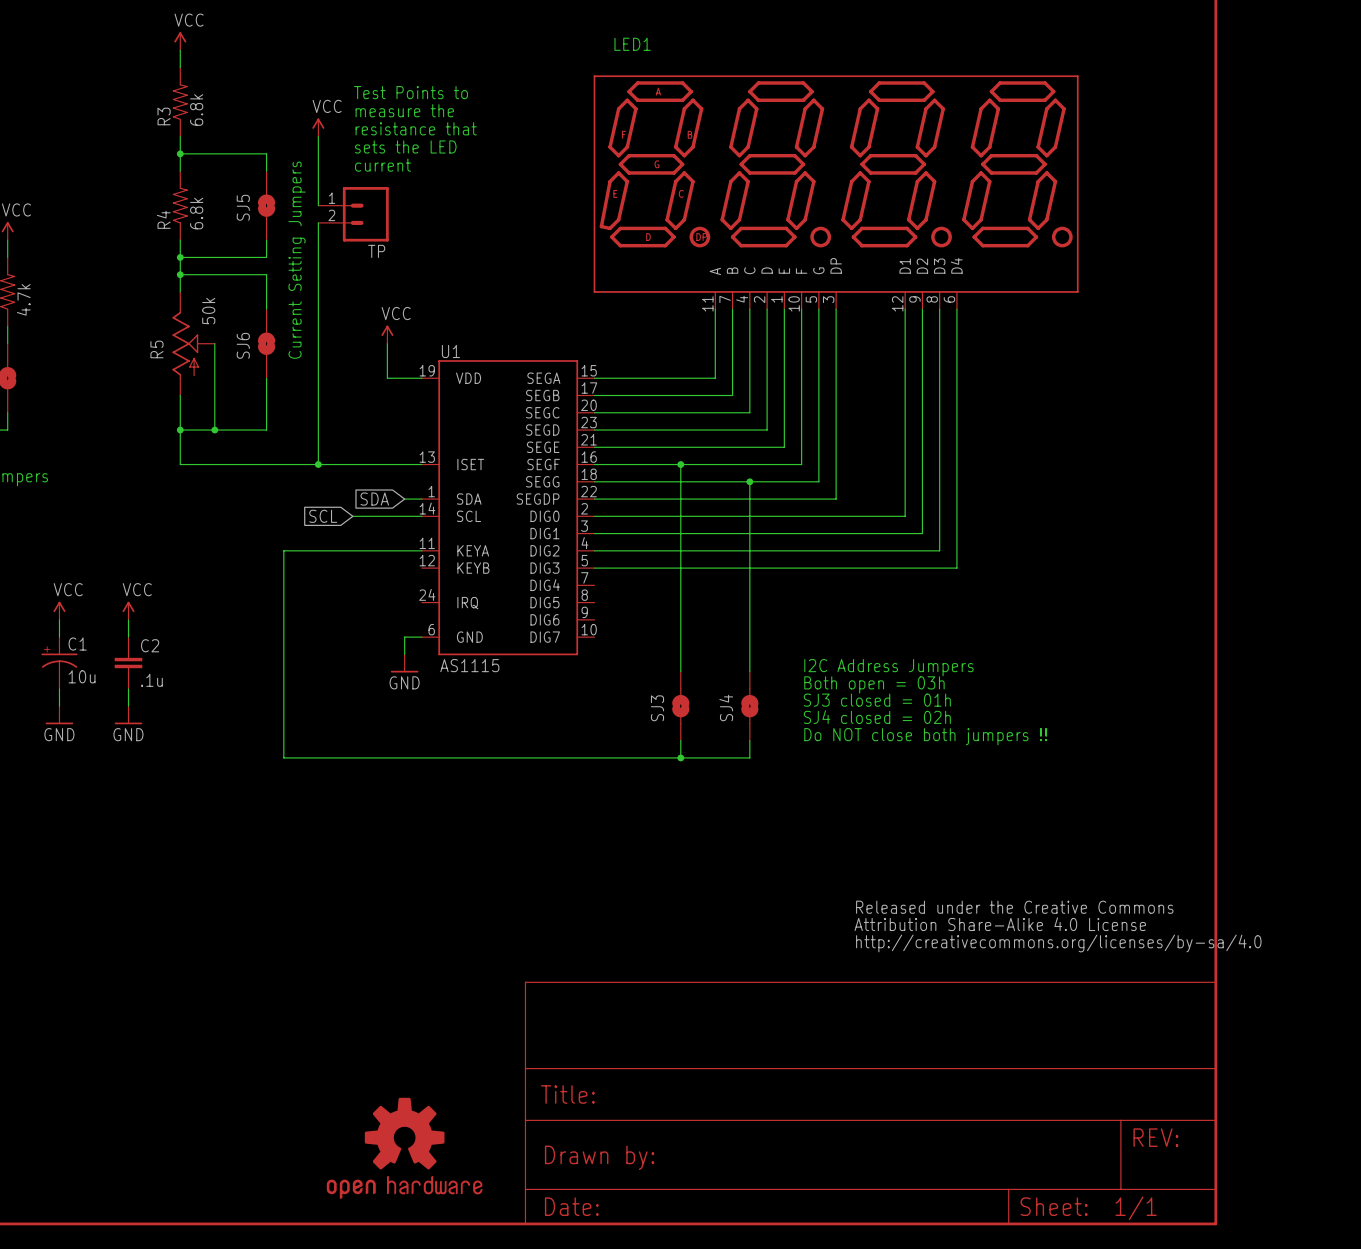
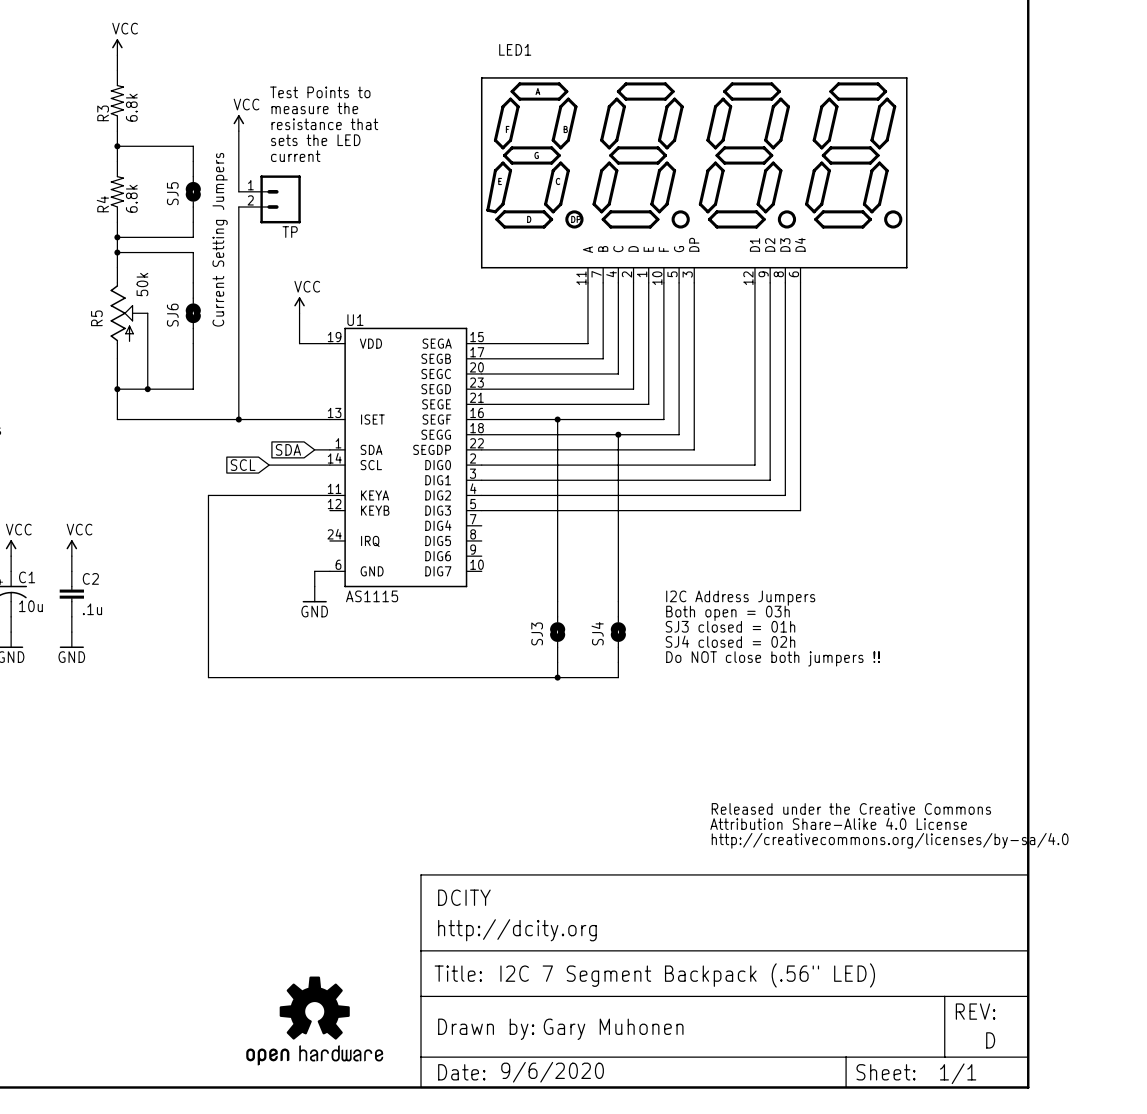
part text: none -> DCITY (464, 897)
part text: none -> http://dcity.org (517, 930)
part text: none -> I2C 7 Segment Backpack (.56" LED) (687, 975)
part text: none -> Gary Muhonen (613, 1029)
part text: none -> D (990, 1040)
part text: none -> 9/6/2020 (552, 1072)

